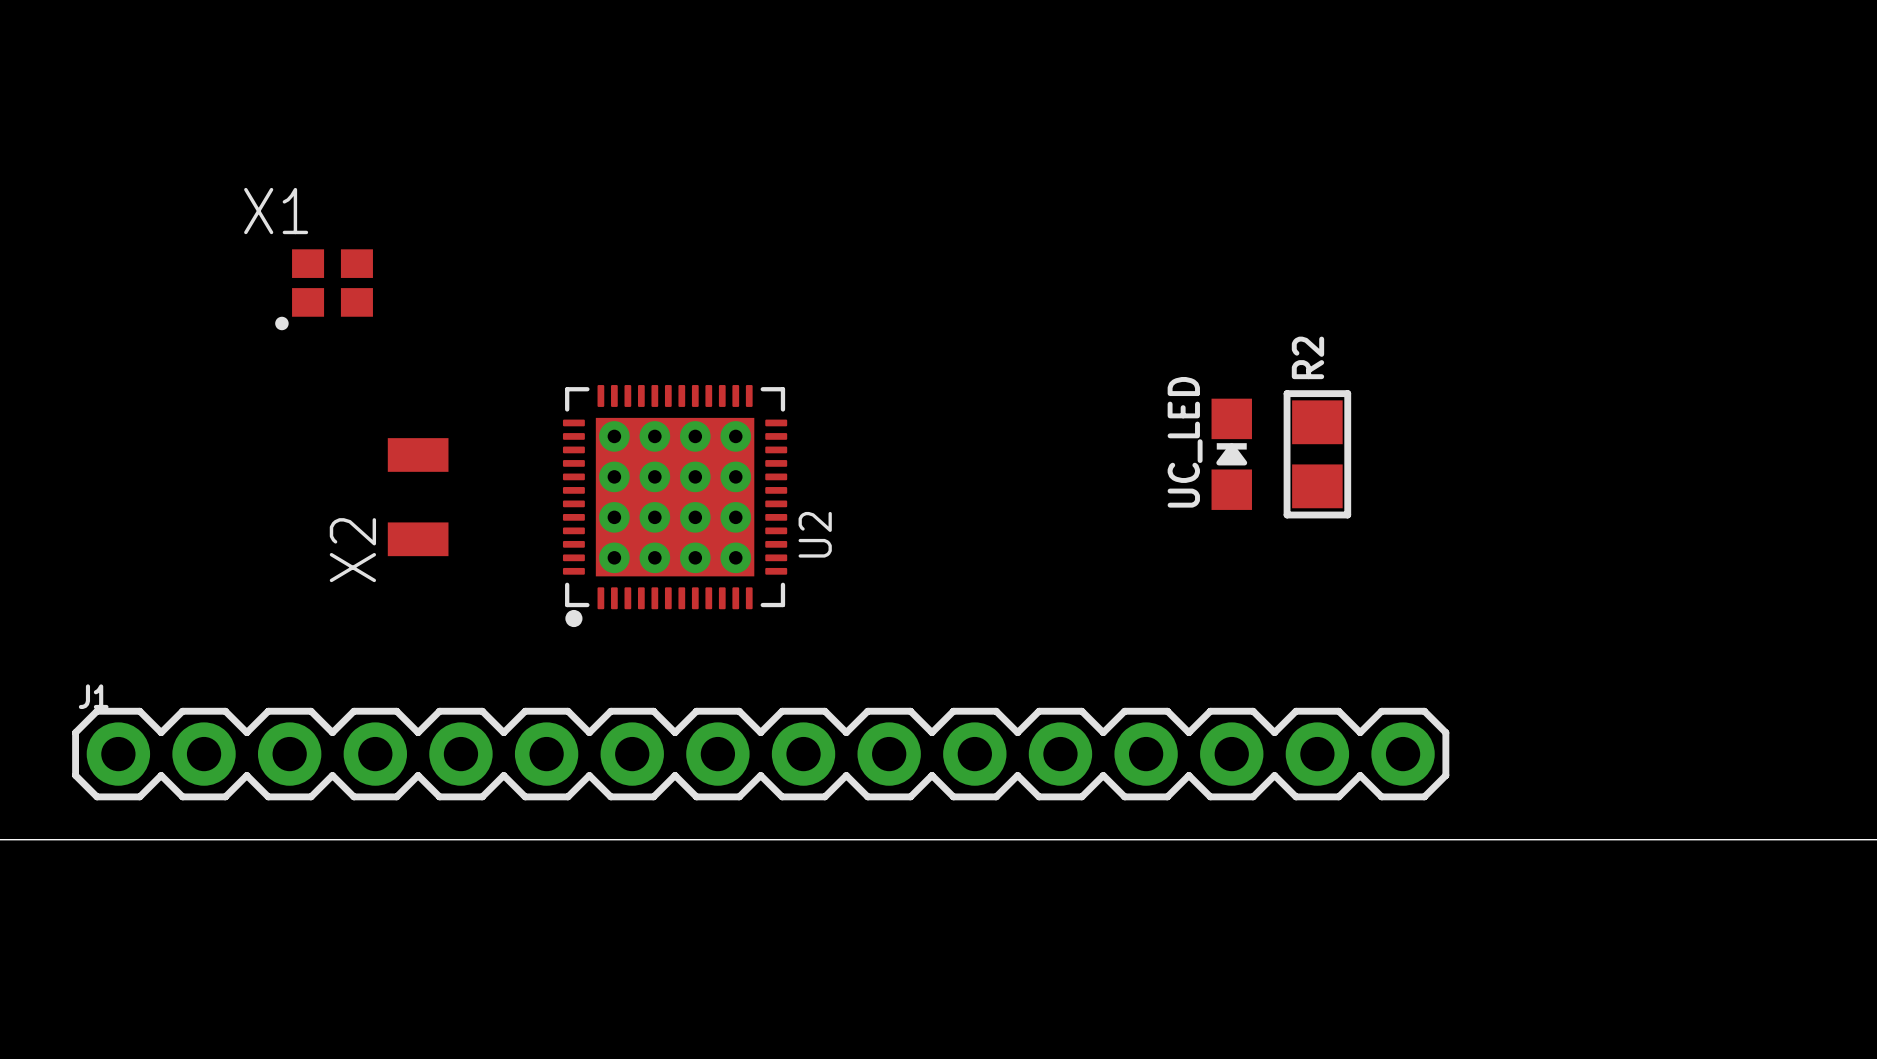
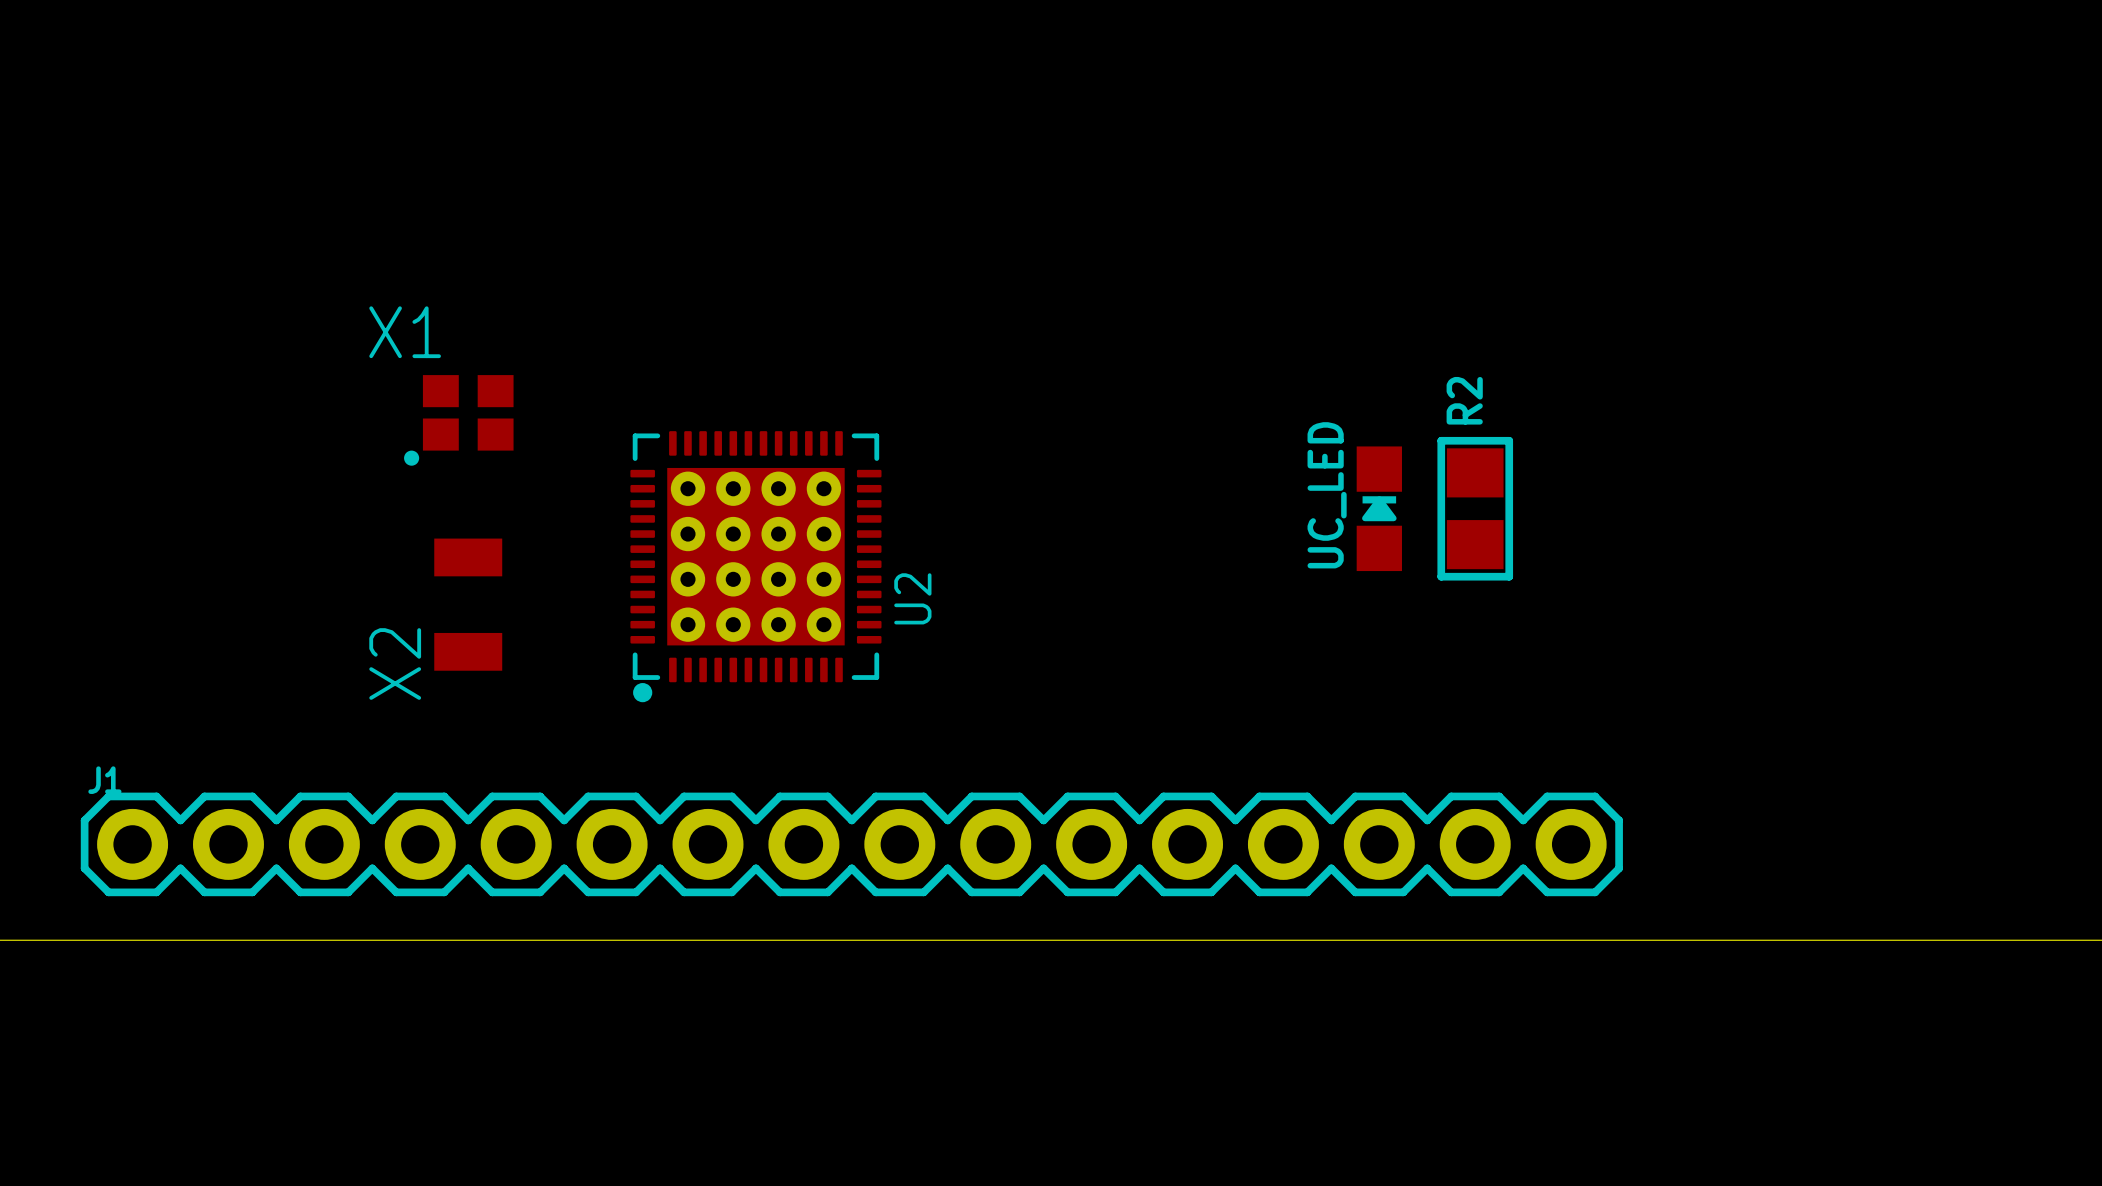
X1 position: (324, 289) -> (458, 420)
X2 position: (418, 497) -> (468, 604)

